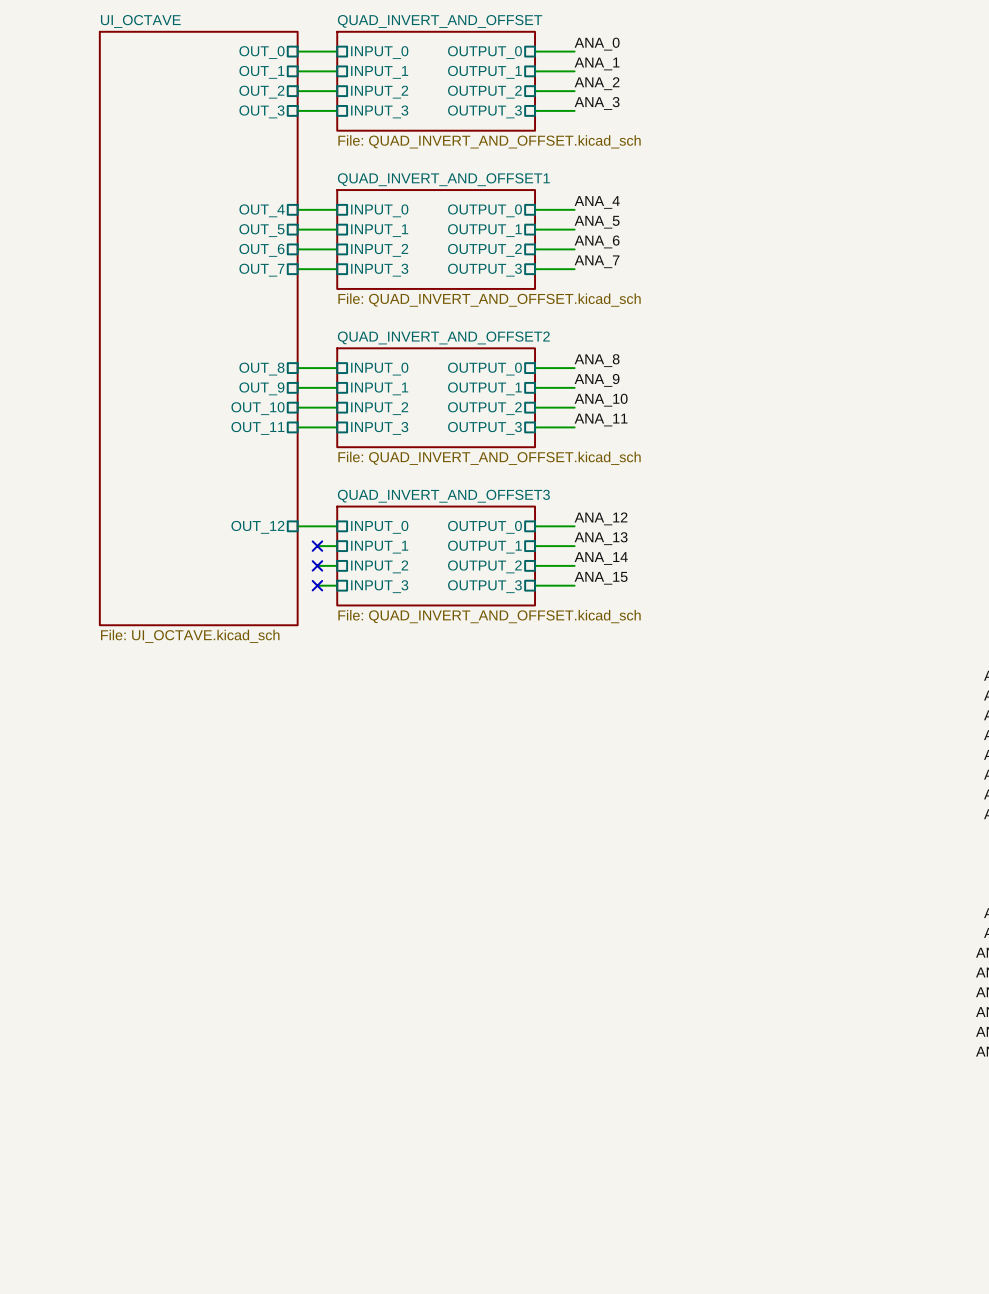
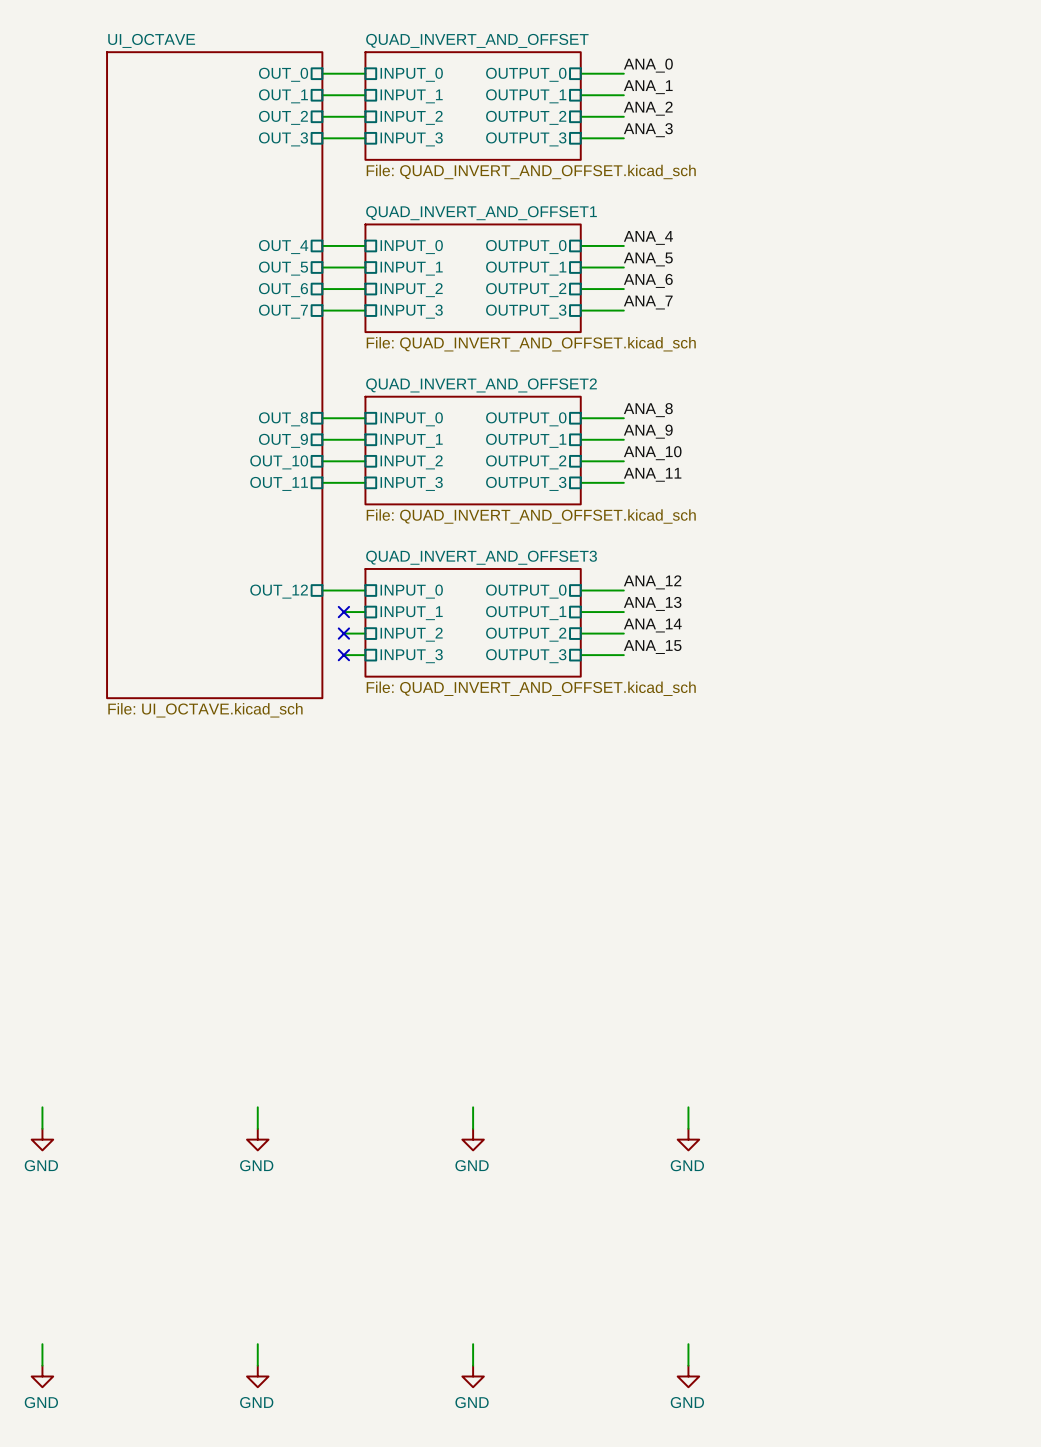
wire: none -> (42, 1107) (42, 1128)
wire: none -> (257, 1107) (257, 1128)
wire: none -> (473, 1107) (473, 1128)
wire: none -> (688, 1107) (688, 1128)
power symbol: none -> GND (42, 1139)
power symbol: none -> GND (257, 1139)
power symbol: none -> GND (473, 1139)
power symbol: none -> GND (688, 1139)
wire: none -> (42, 1344) (42, 1365)
wire: none -> (257, 1344) (257, 1365)
wire: none -> (473, 1344) (473, 1365)
wire: none -> (688, 1344) (688, 1365)
power symbol: none -> GND (42, 1376)
power symbol: none -> GND (257, 1376)
power symbol: none -> GND (473, 1376)
power symbol: none -> GND (688, 1376)

